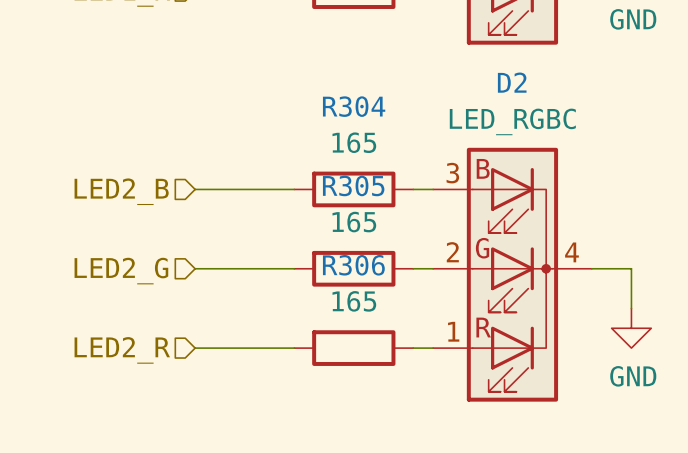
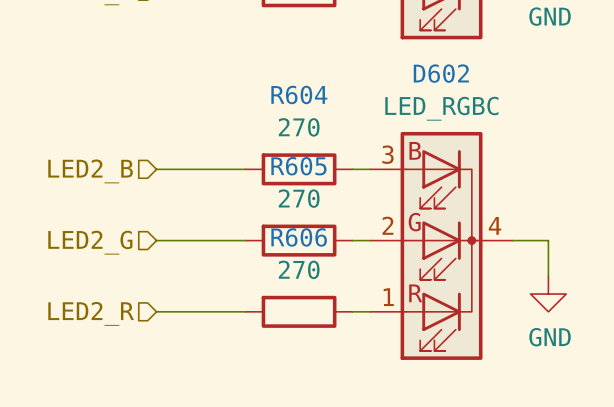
D2 name: D2 (512, 82) -> D602 (441, 73)
R304 name: R304 (354, 106) -> R604 (299, 94)
R304 value: 165 (354, 142) -> 270 (299, 127)
R305 name: R305 (353, 185) -> R605 (298, 166)
R305 value: 165 (354, 222) -> 270 (299, 198)
R306 name: R306 (353, 265) -> R606 (299, 237)
R306 value: 165 (354, 301) -> 270 (299, 269)

